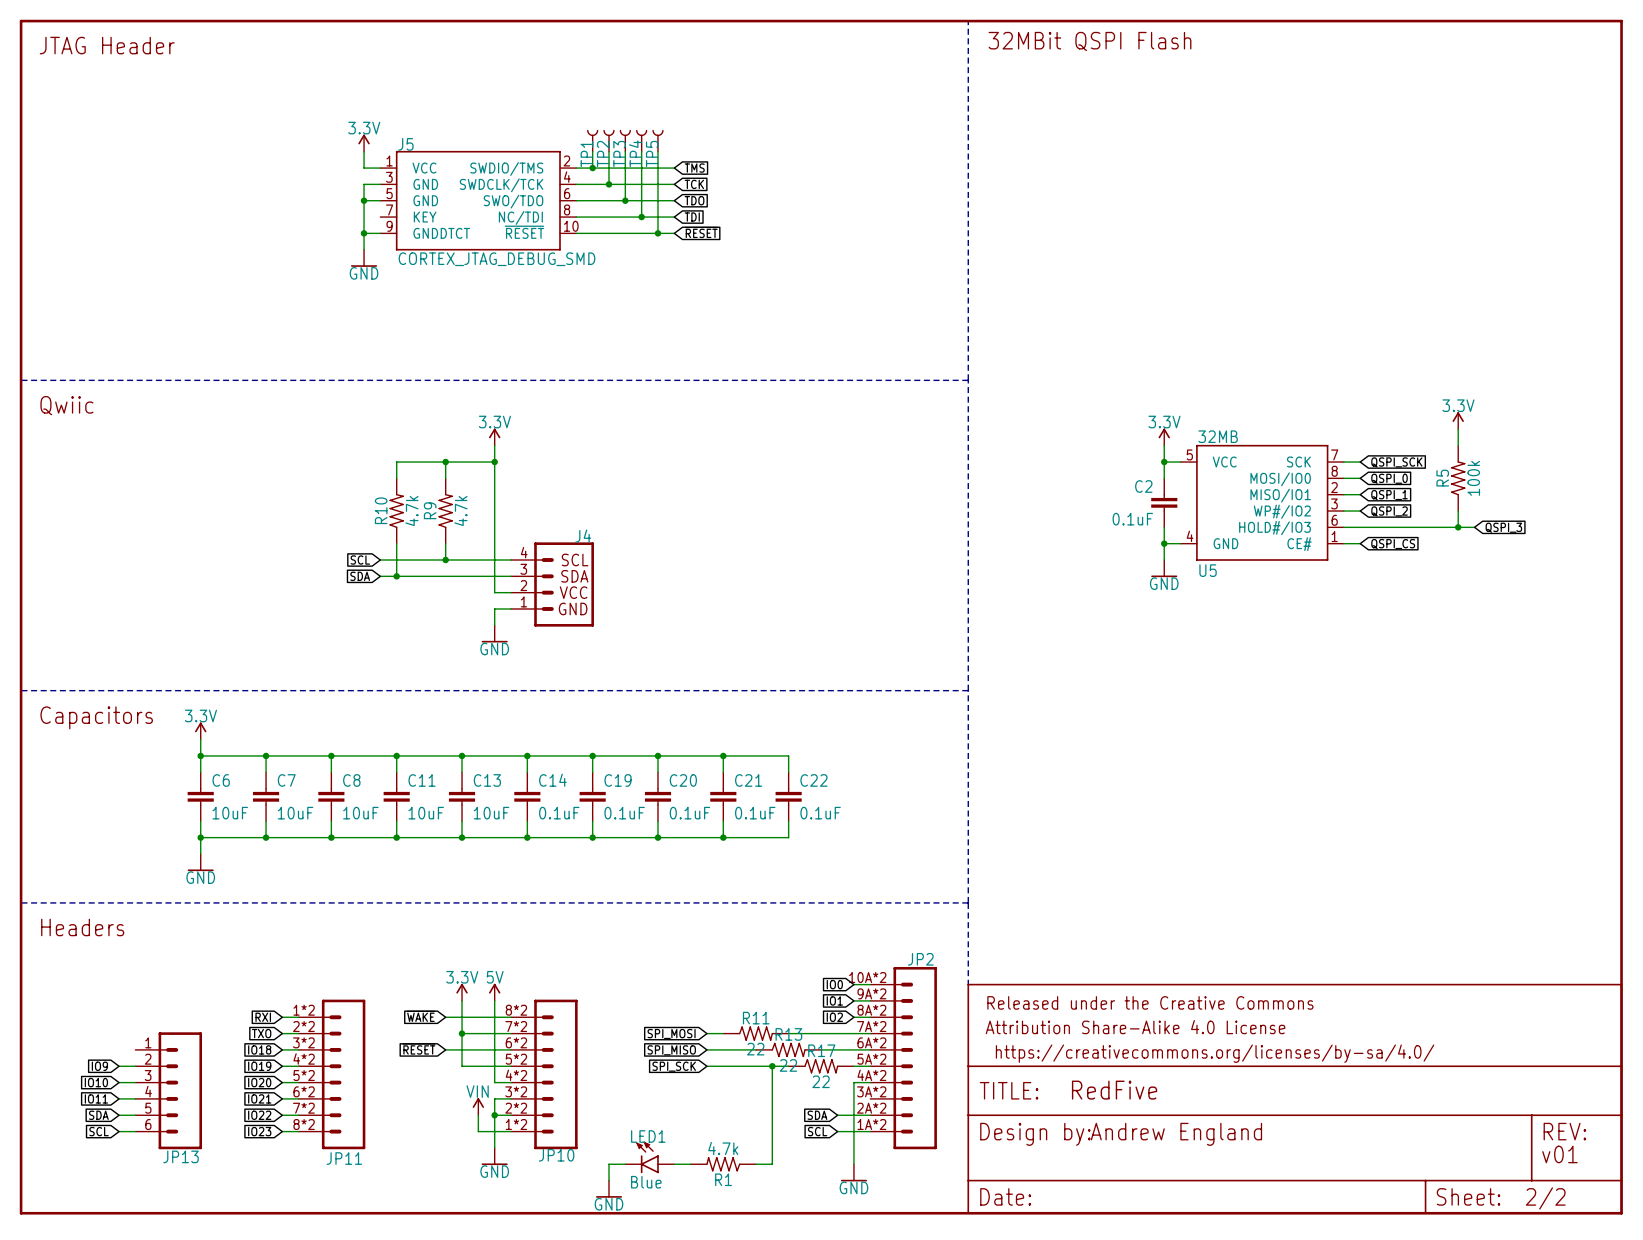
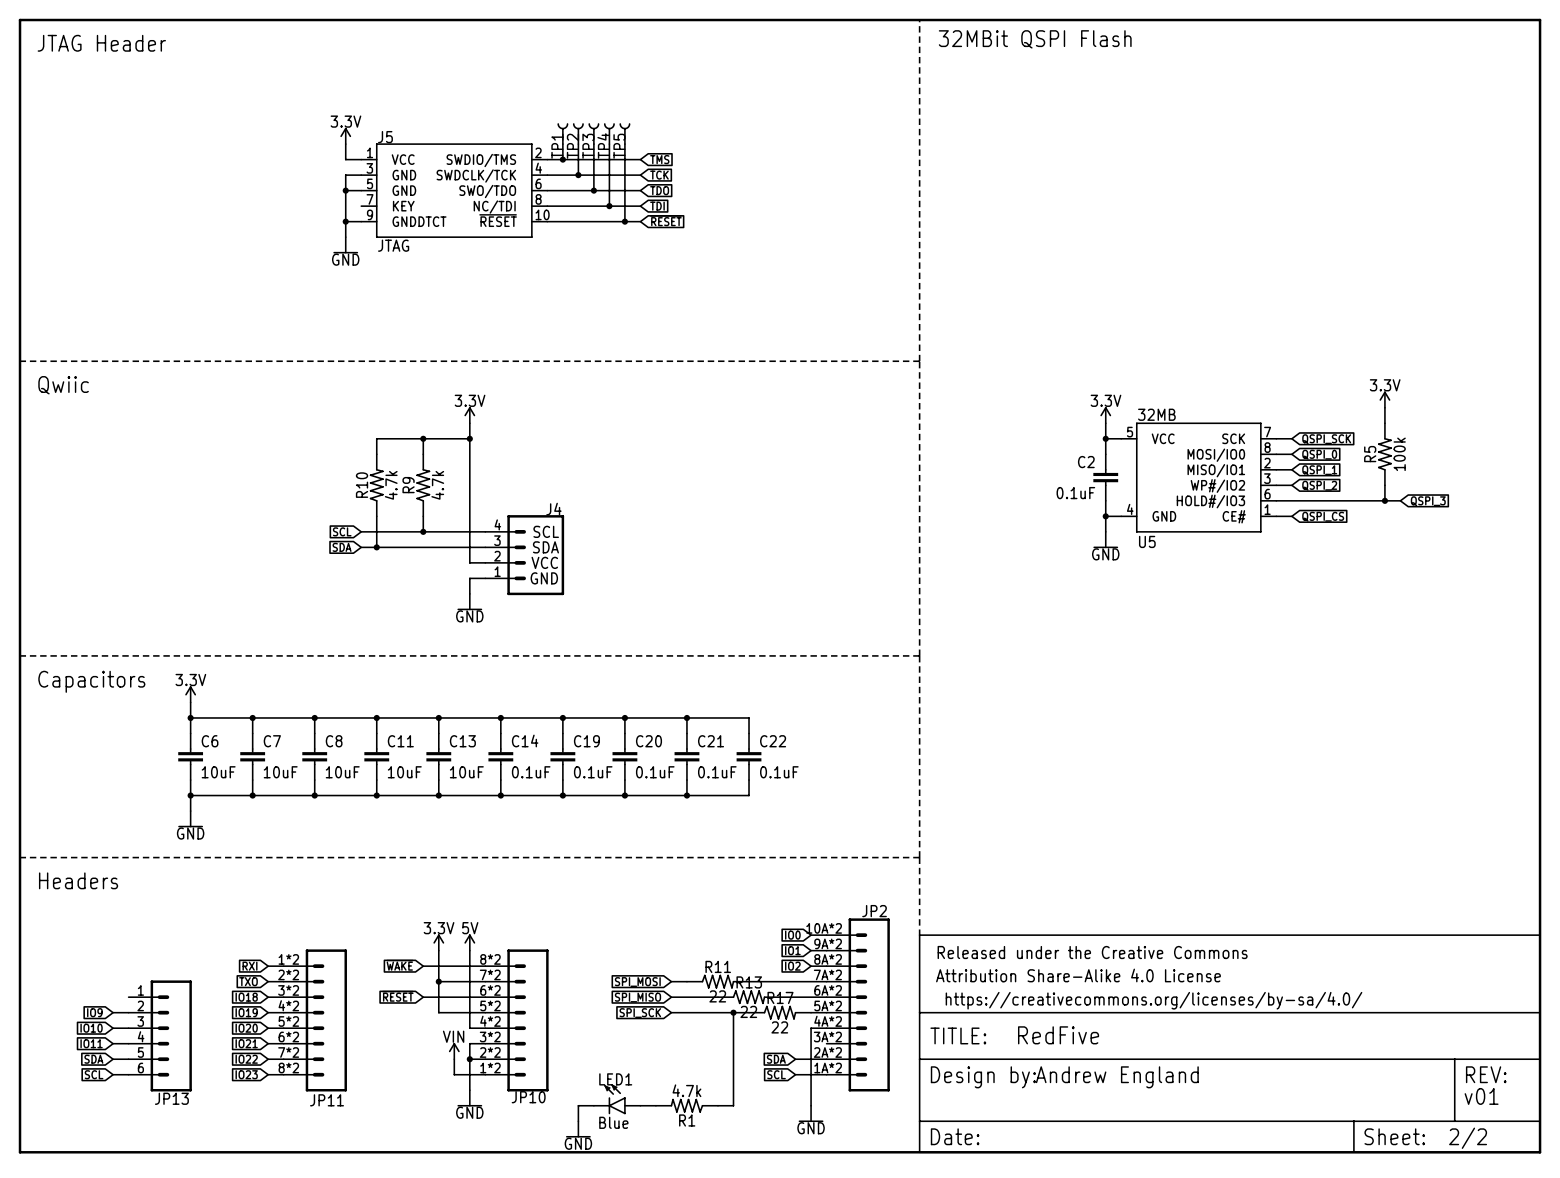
J5 value: CORTEX_JTAG_DEBUG_SMD (496, 259) -> JTAG (393, 245)

